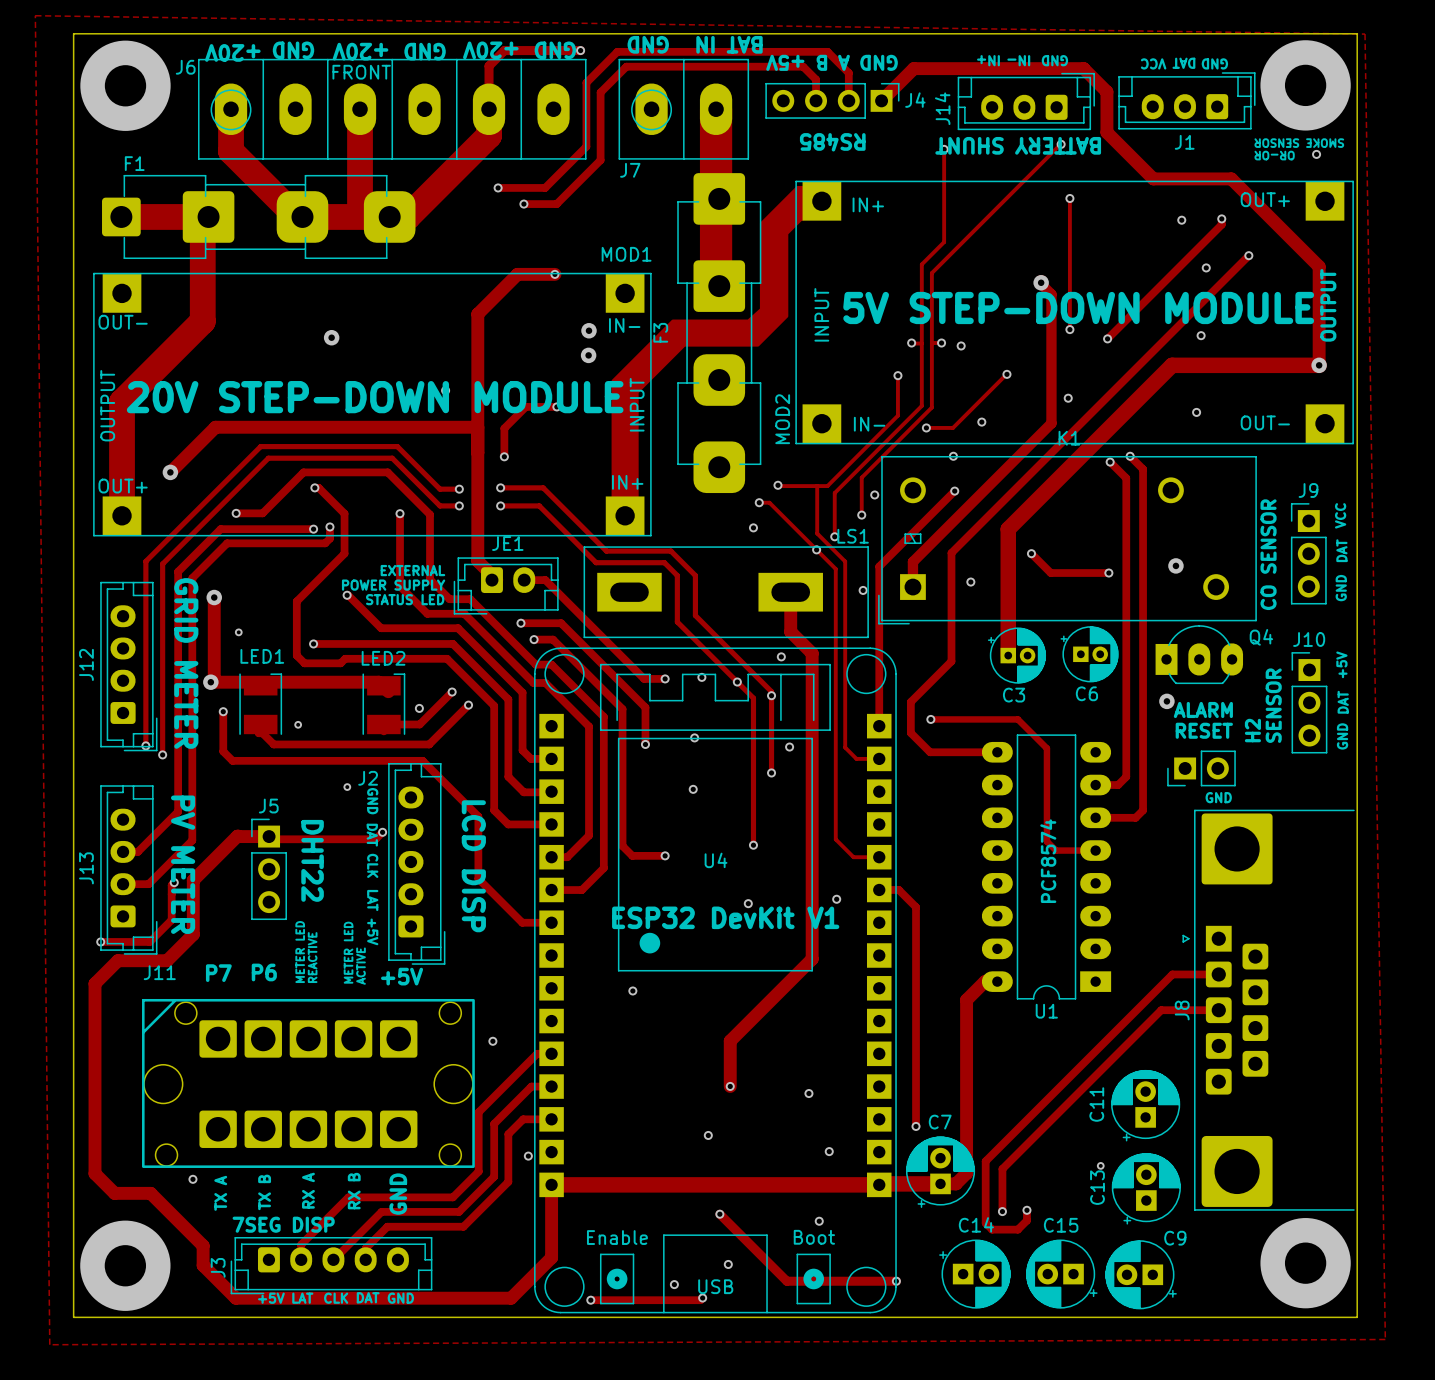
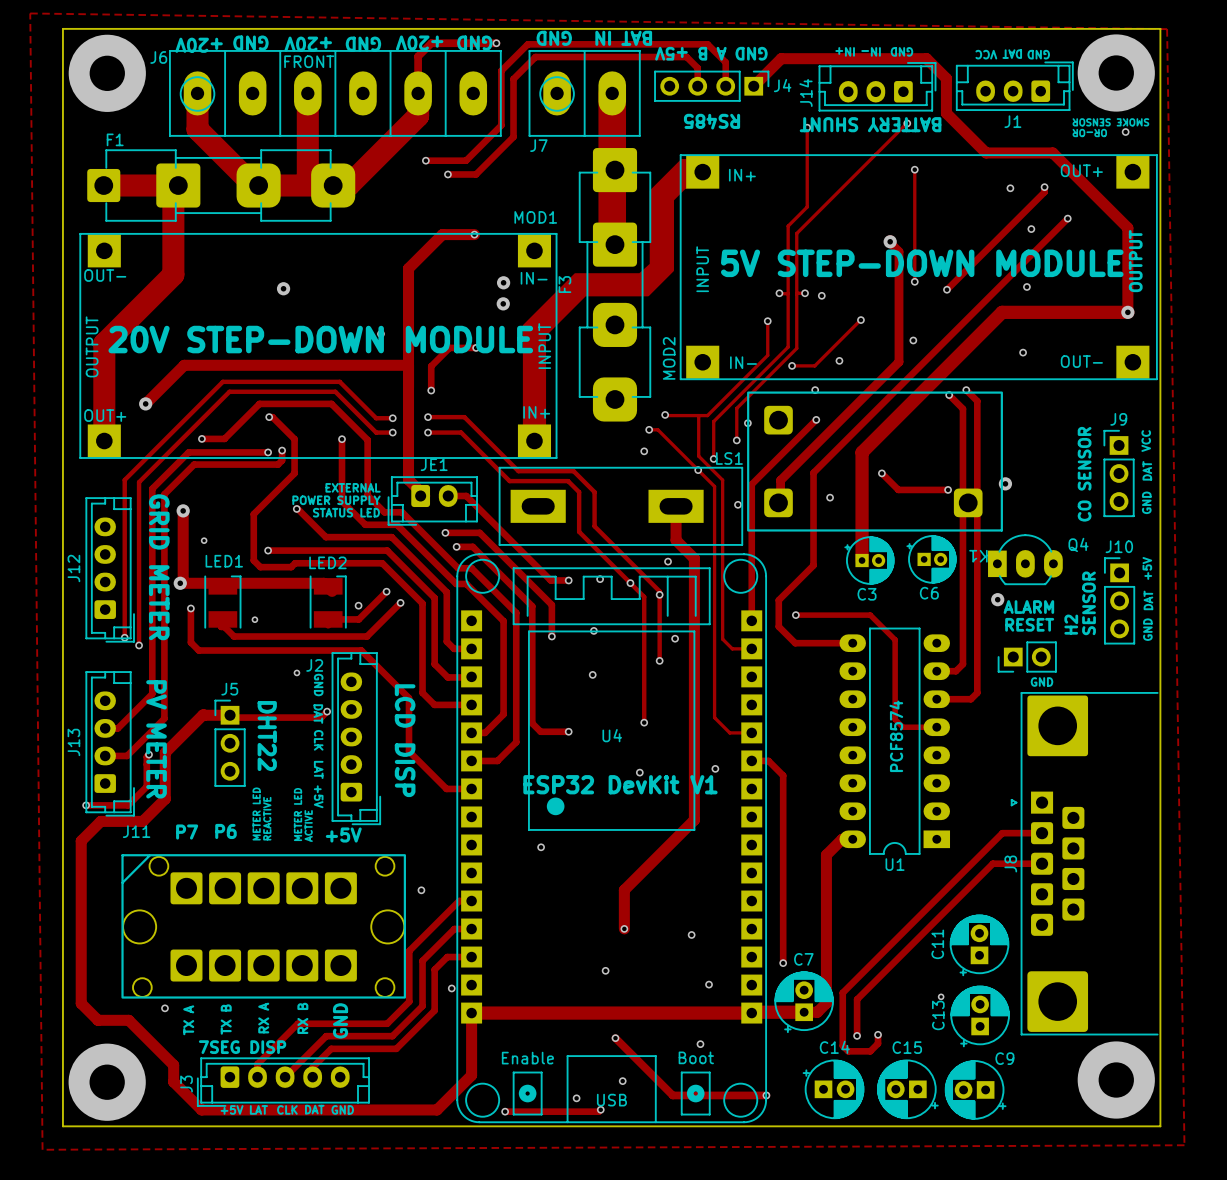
K1 name position: K1 (1069, 438) -> K1 (978, 556)
K1 footprint: [878, 455, 1257, 625] -> [747, 391, 1003, 532]

